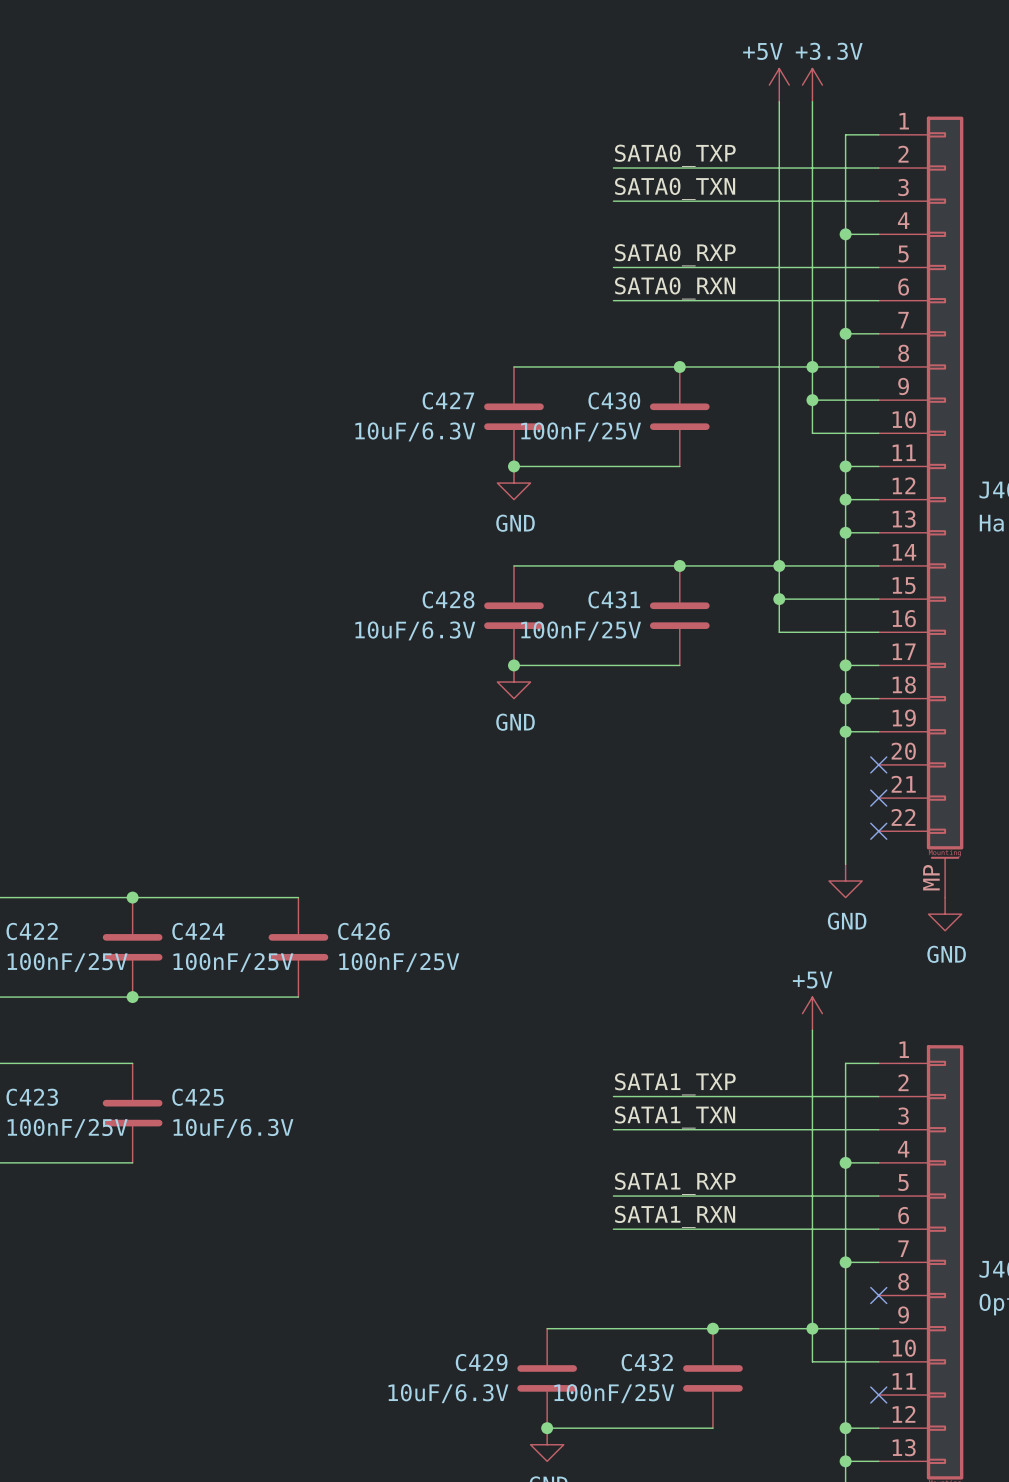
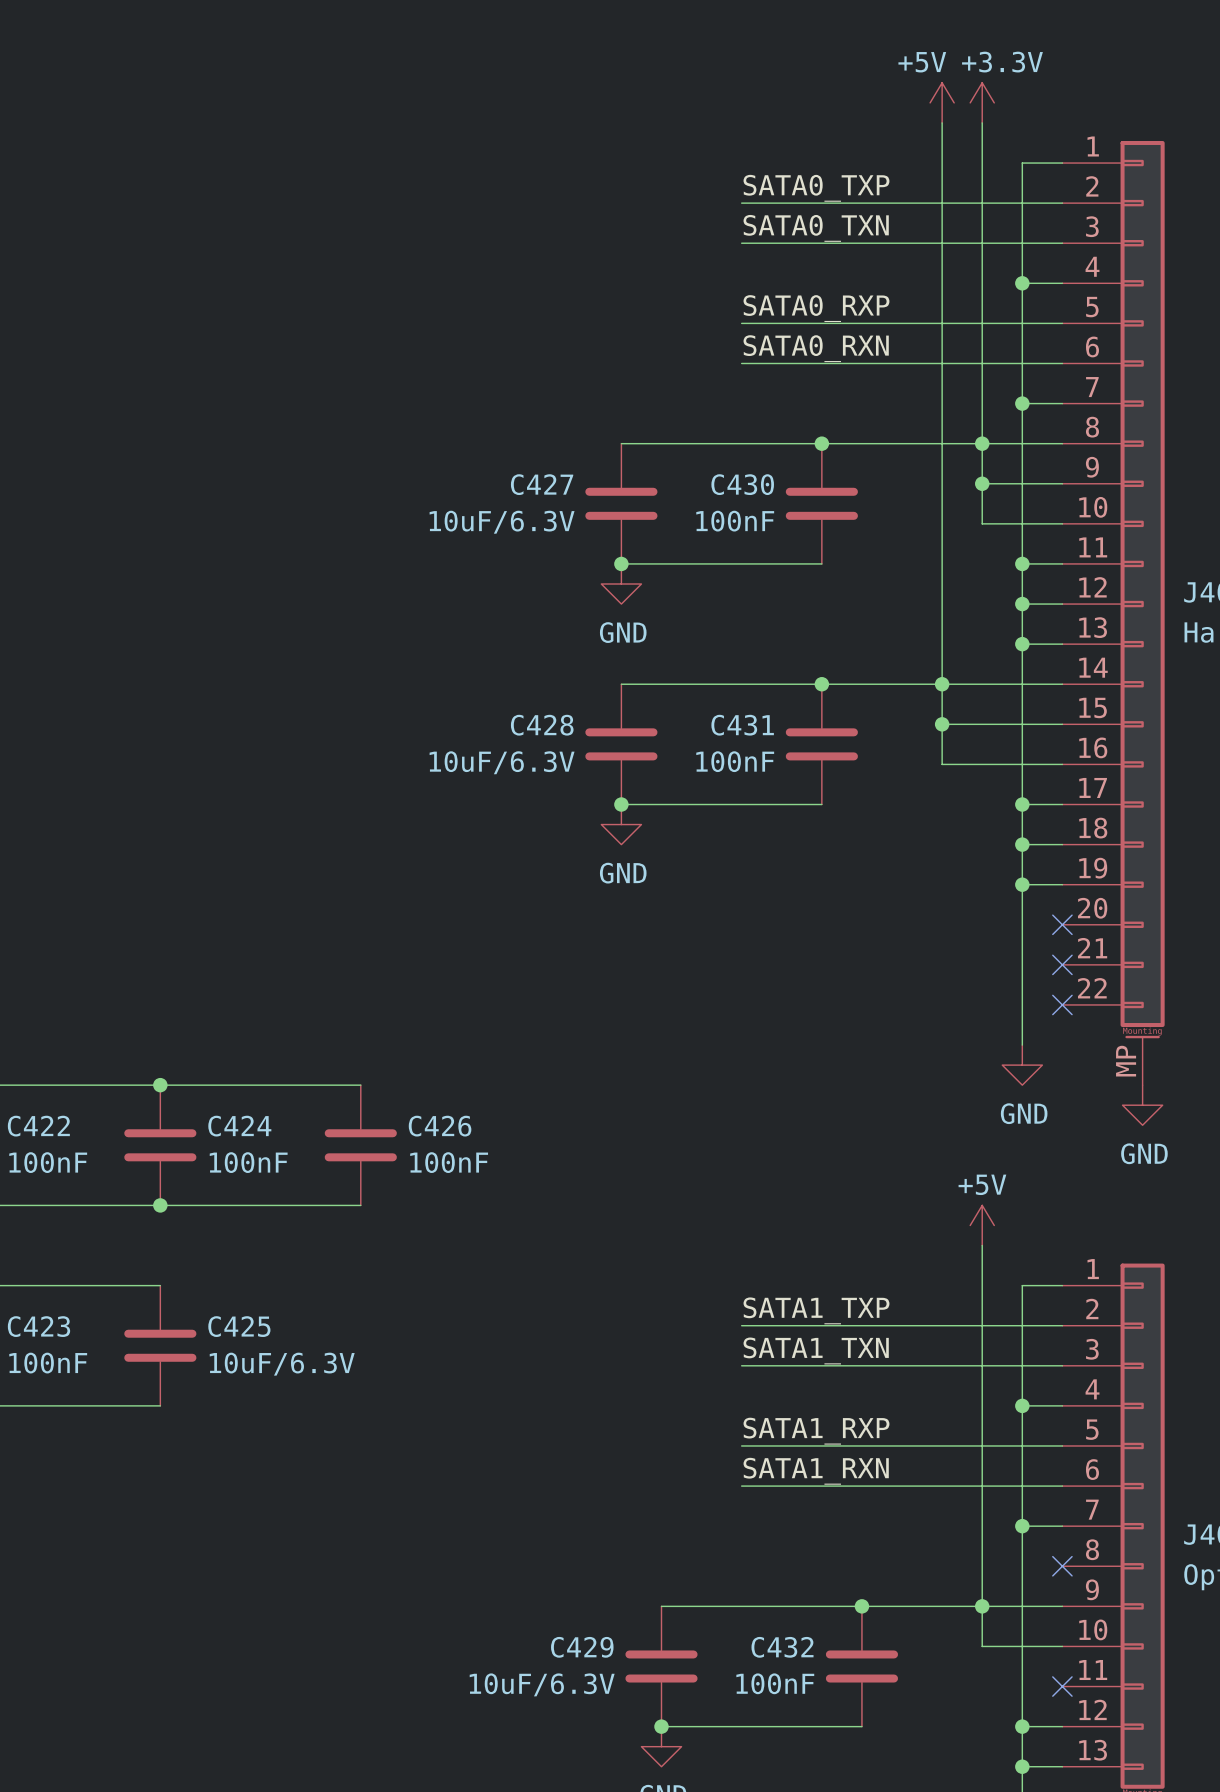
C430 value: 100nF/25V (581, 431) -> 100nF (735, 521)
C431 value: 100nF/25V (581, 630) -> 100nF (735, 761)
C422 value: 100nF/25V (67, 962) -> 100nF (48, 1162)
C424 value: 100nF/25V (233, 962) -> 100nF (248, 1162)
C426 value: 100nF/25V (399, 962) -> 100nF (449, 1162)
C423 value: 100nF/25V (67, 1128) -> 100nF (48, 1363)
C432 value: 100nF/25V (614, 1393) -> 100nF (775, 1683)

